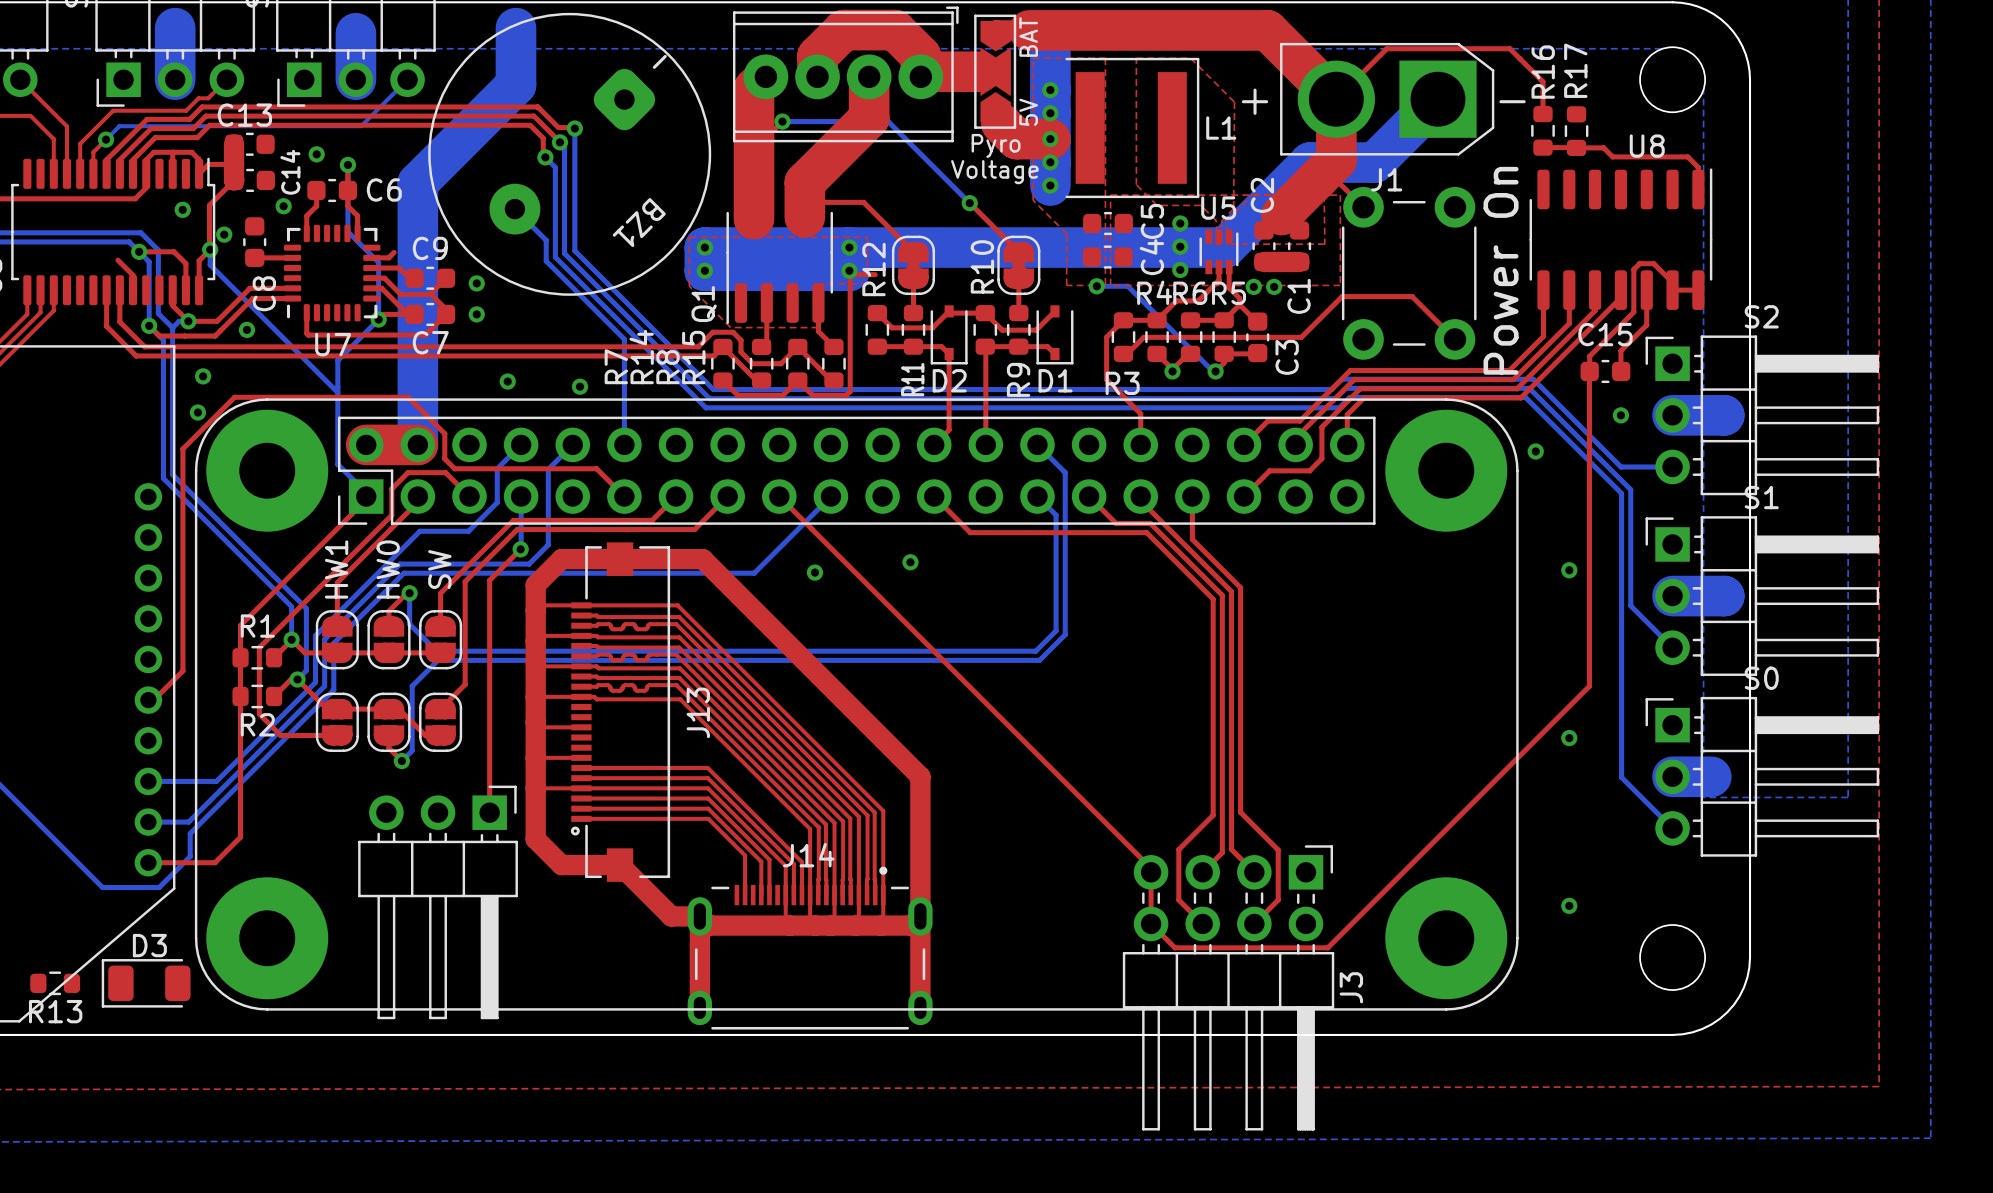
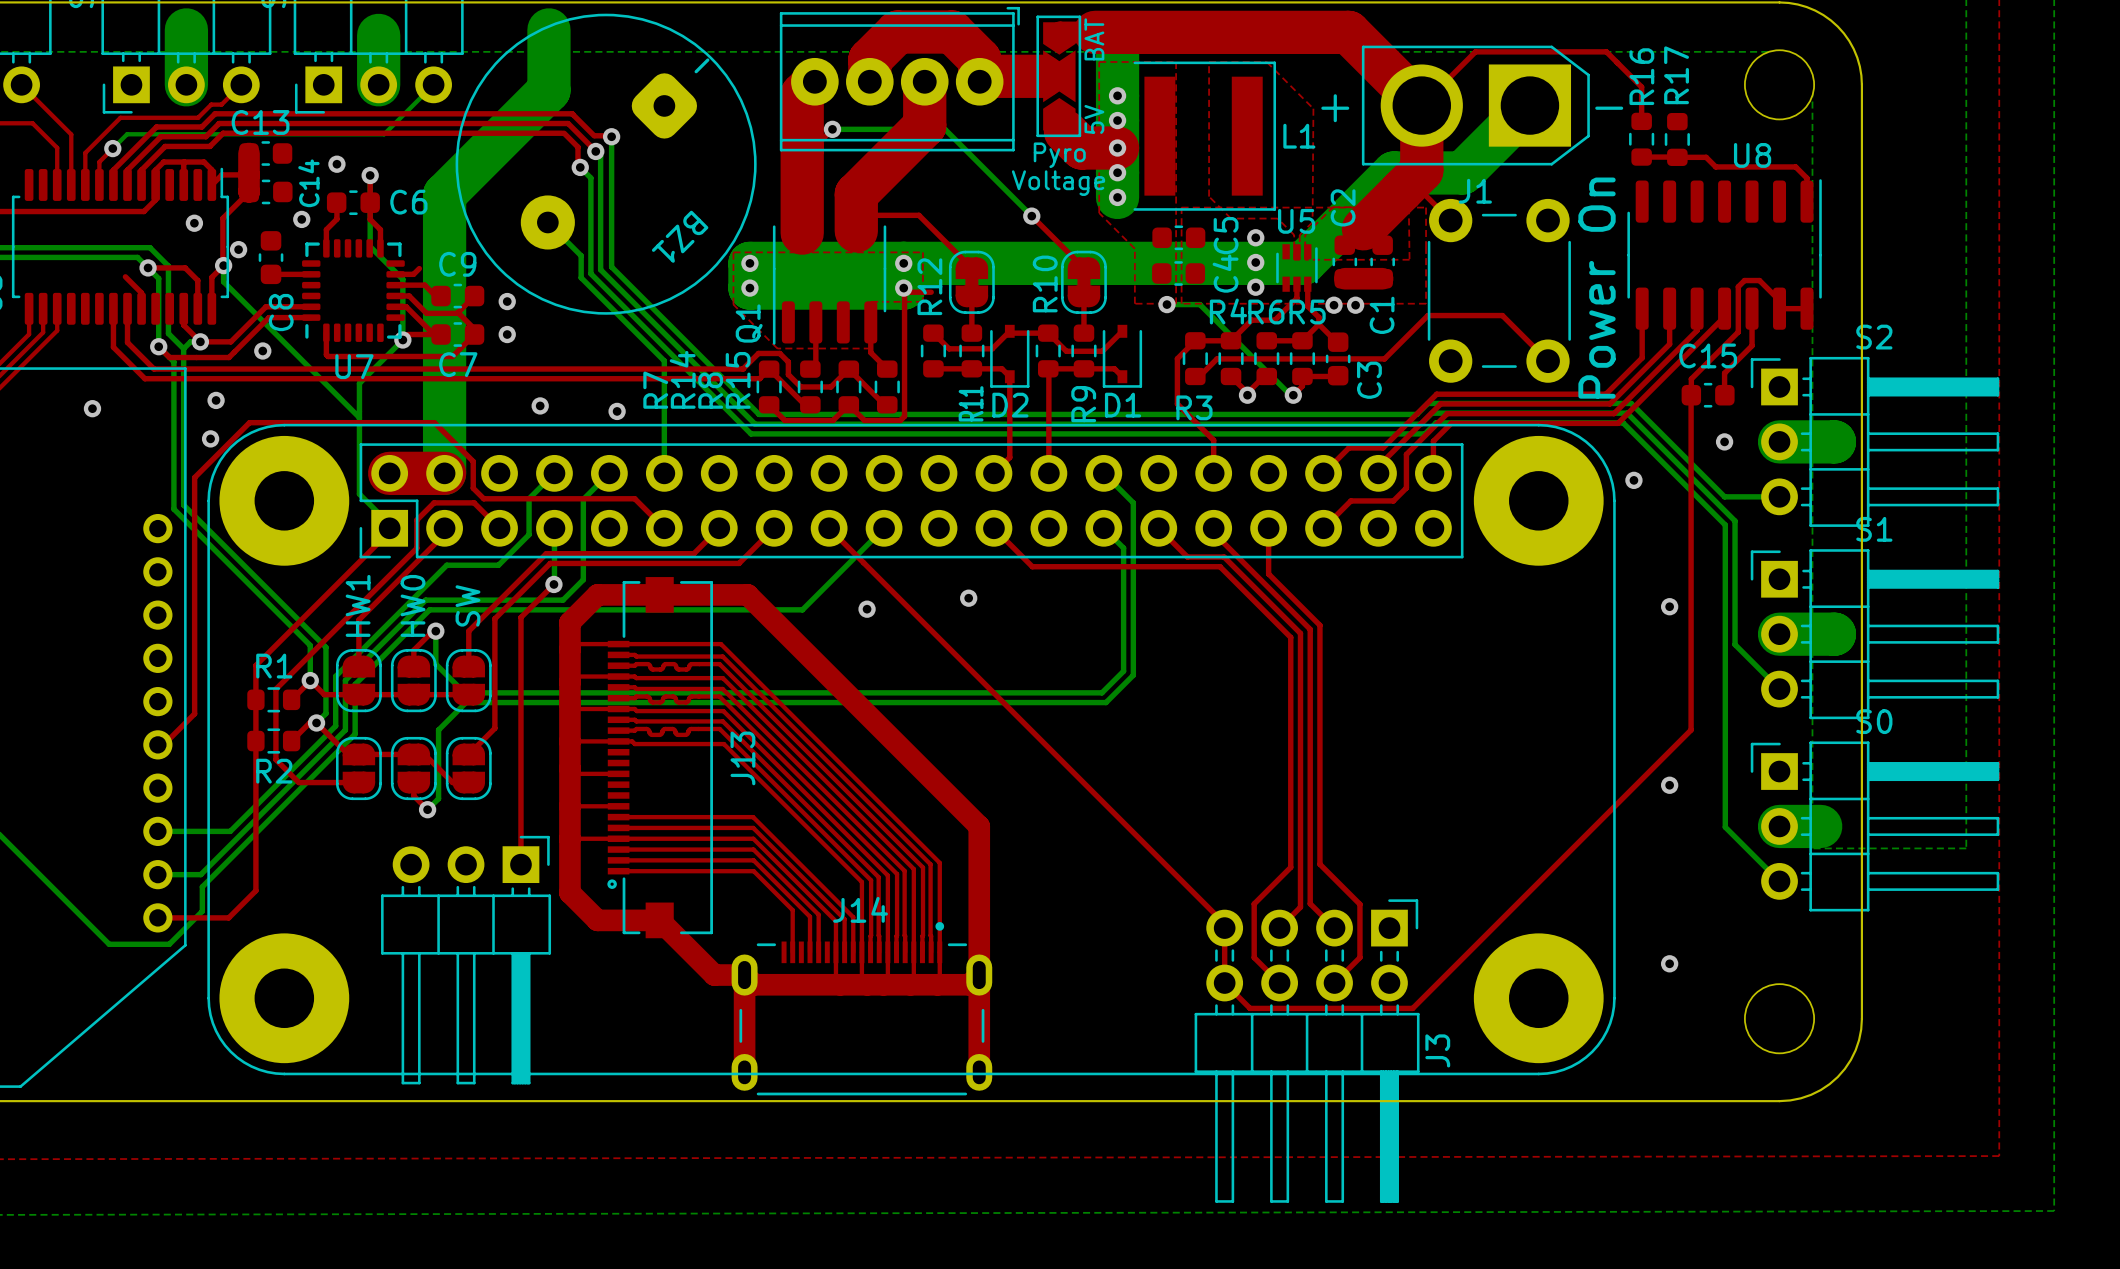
via: none -> (92, 408)
R13: (55, 983) -> none
D3: (146, 983) -> none

